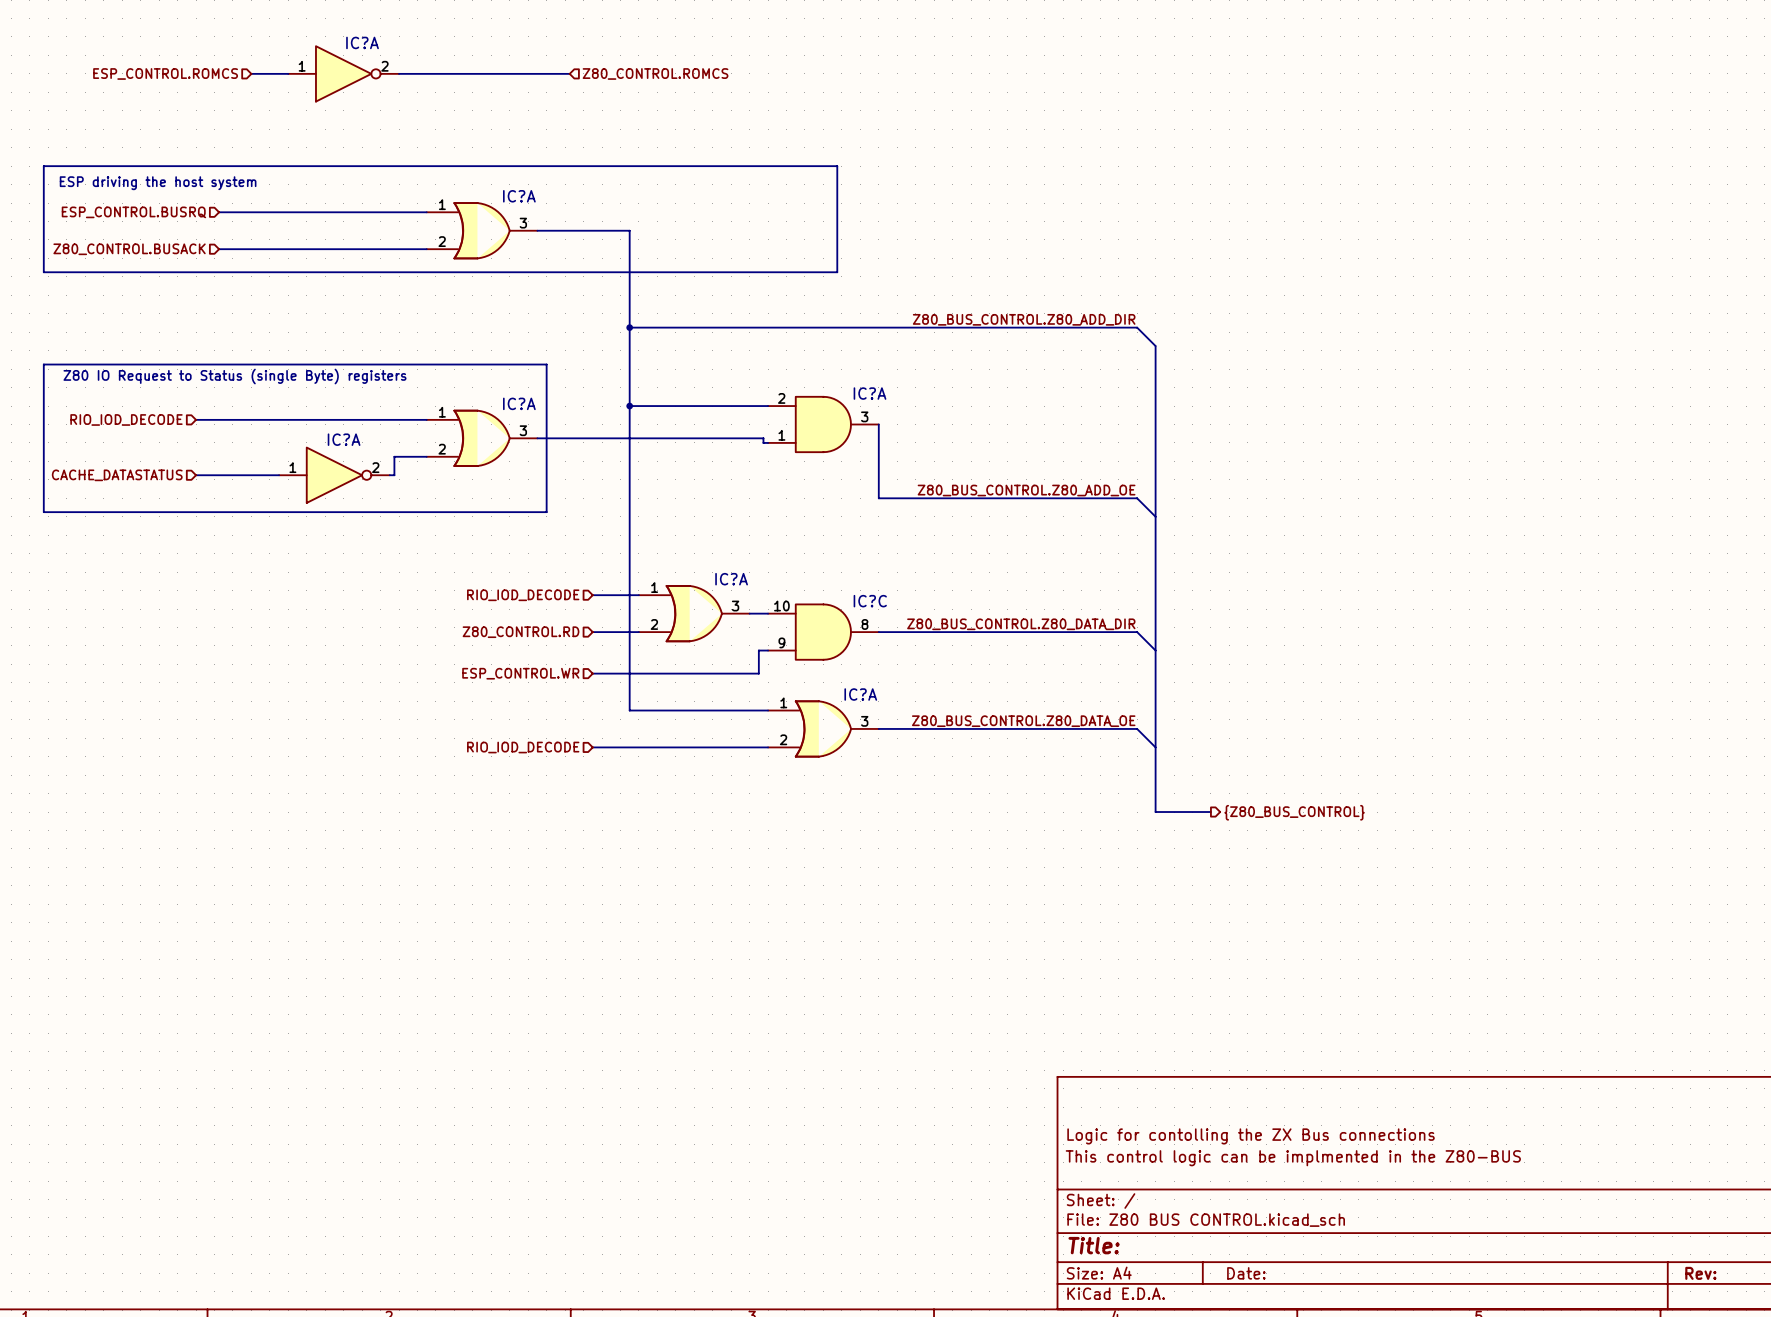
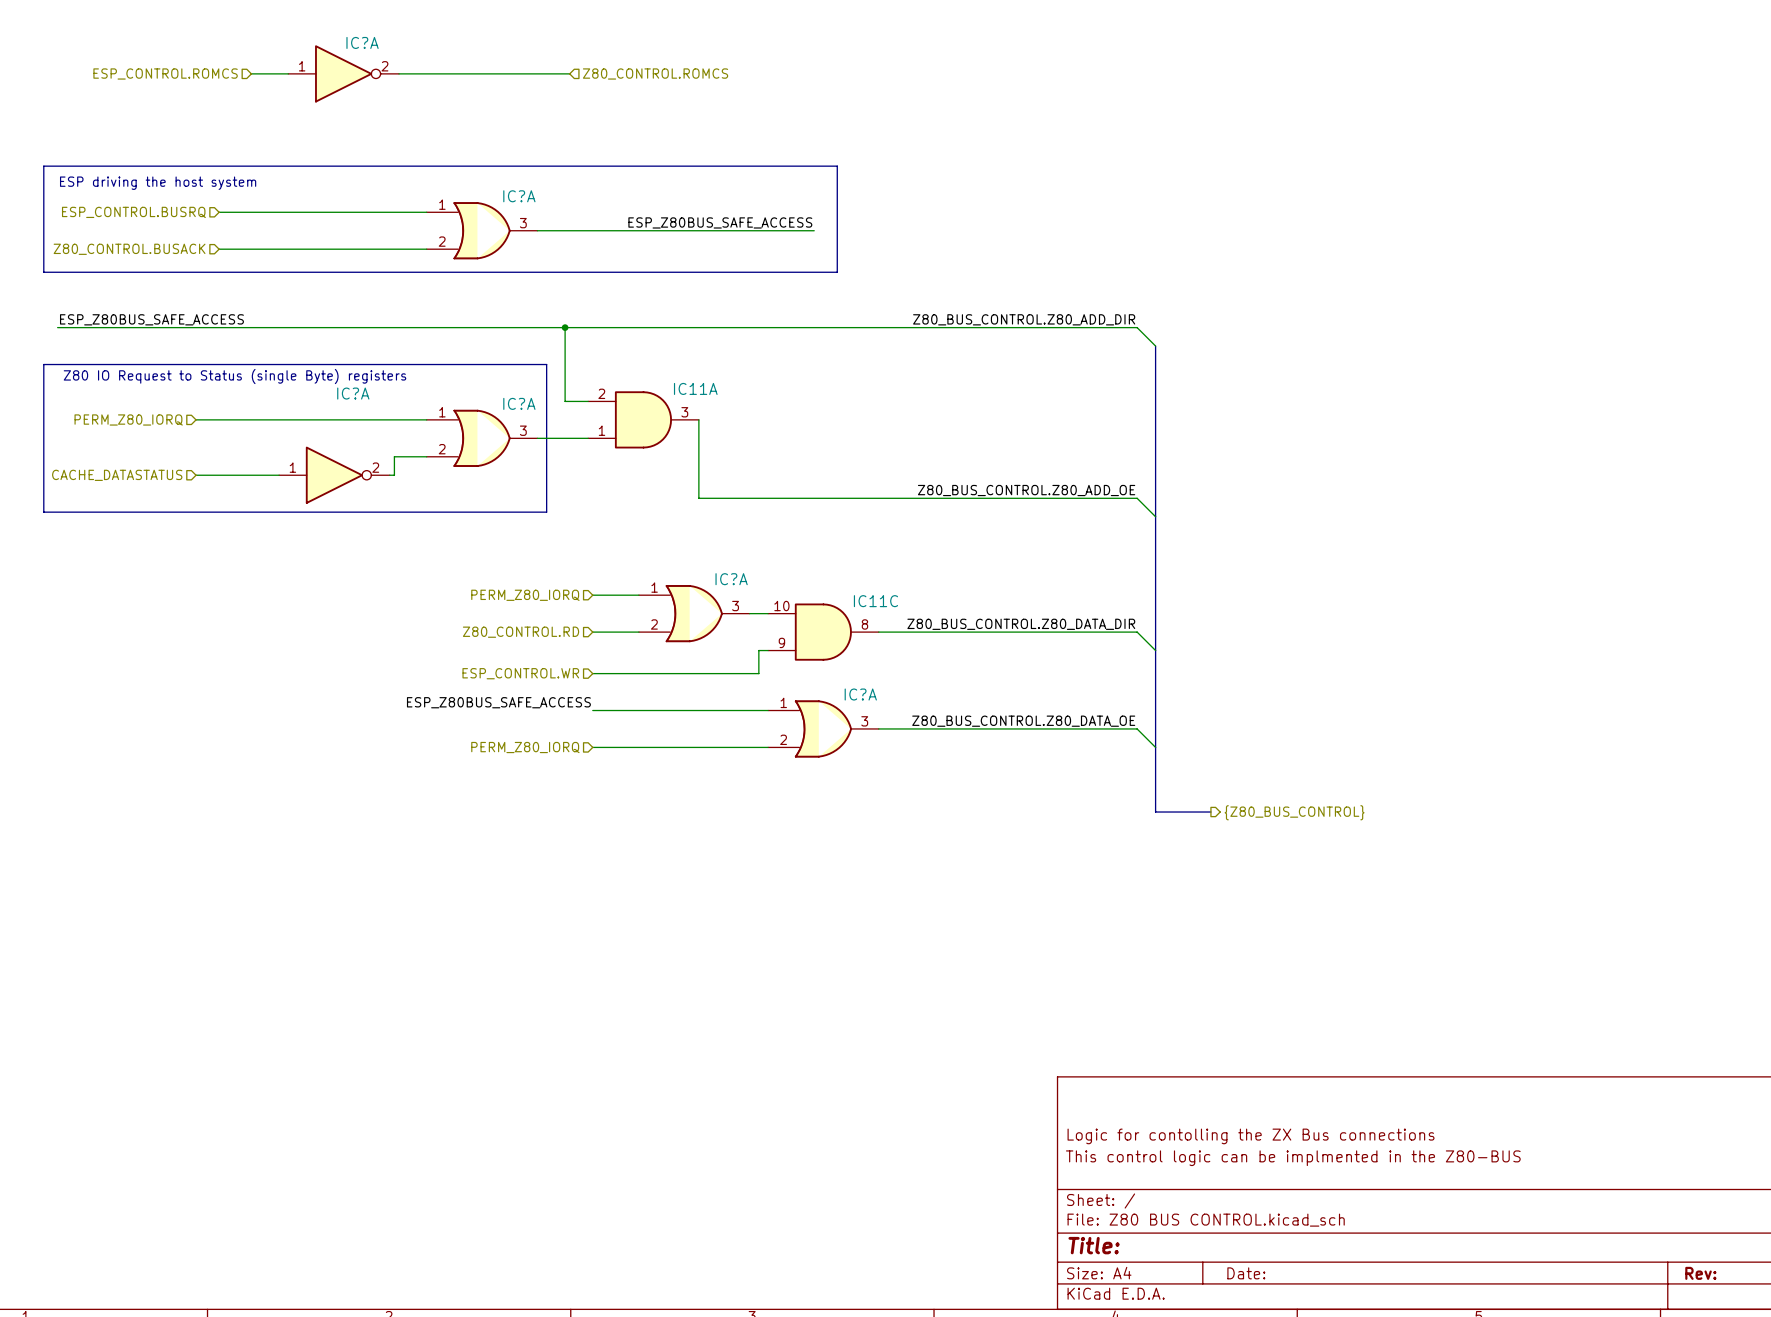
label: none -> ESP_Z80BUS_SAFE_ACCESS (720, 222)
wire: (629, 230) (629, 710) -> (592, 710) (629, 710)
wire: none -> (629, 230) (814, 230)
label: none -> ESP_Z80BUS_SAFE_ACCESS (151, 319)
wire: none -> (57, 327) (629, 327)
wire: none -> (565, 327) (565, 401) (588, 401)
junction: none -> (565, 327)
junction: (629, 327) -> none
wire: (629, 406) (768, 406) -> none
junction: (629, 406) -> none
hierarchical label: RIO_IOD_DECODE (126, 419) -> PERM_Z80_IORQ (128, 419)
IC11A: none -> (643, 419)
IC?A: (823, 424) -> none
wire: (878, 424) (878, 498) -> (698, 419) (698, 498) (878, 498)
wire: (588, 438) (763, 438) (763, 442) (768, 442) -> none
IC?A name position: IC?A (344, 439) -> IC?A (353, 393)
hierarchical label: RIO_IOD_DECODE (523, 595) -> PERM_Z80_IORQ (525, 595)
IC?C name: IC?C (870, 601) -> IC11C (875, 601)
label: none -> ESP_Z80BUS_SAFE_ACCESS (498, 702)
hierarchical label: RIO_IOD_DECODE (523, 747) -> PERM_Z80_IORQ (525, 747)

